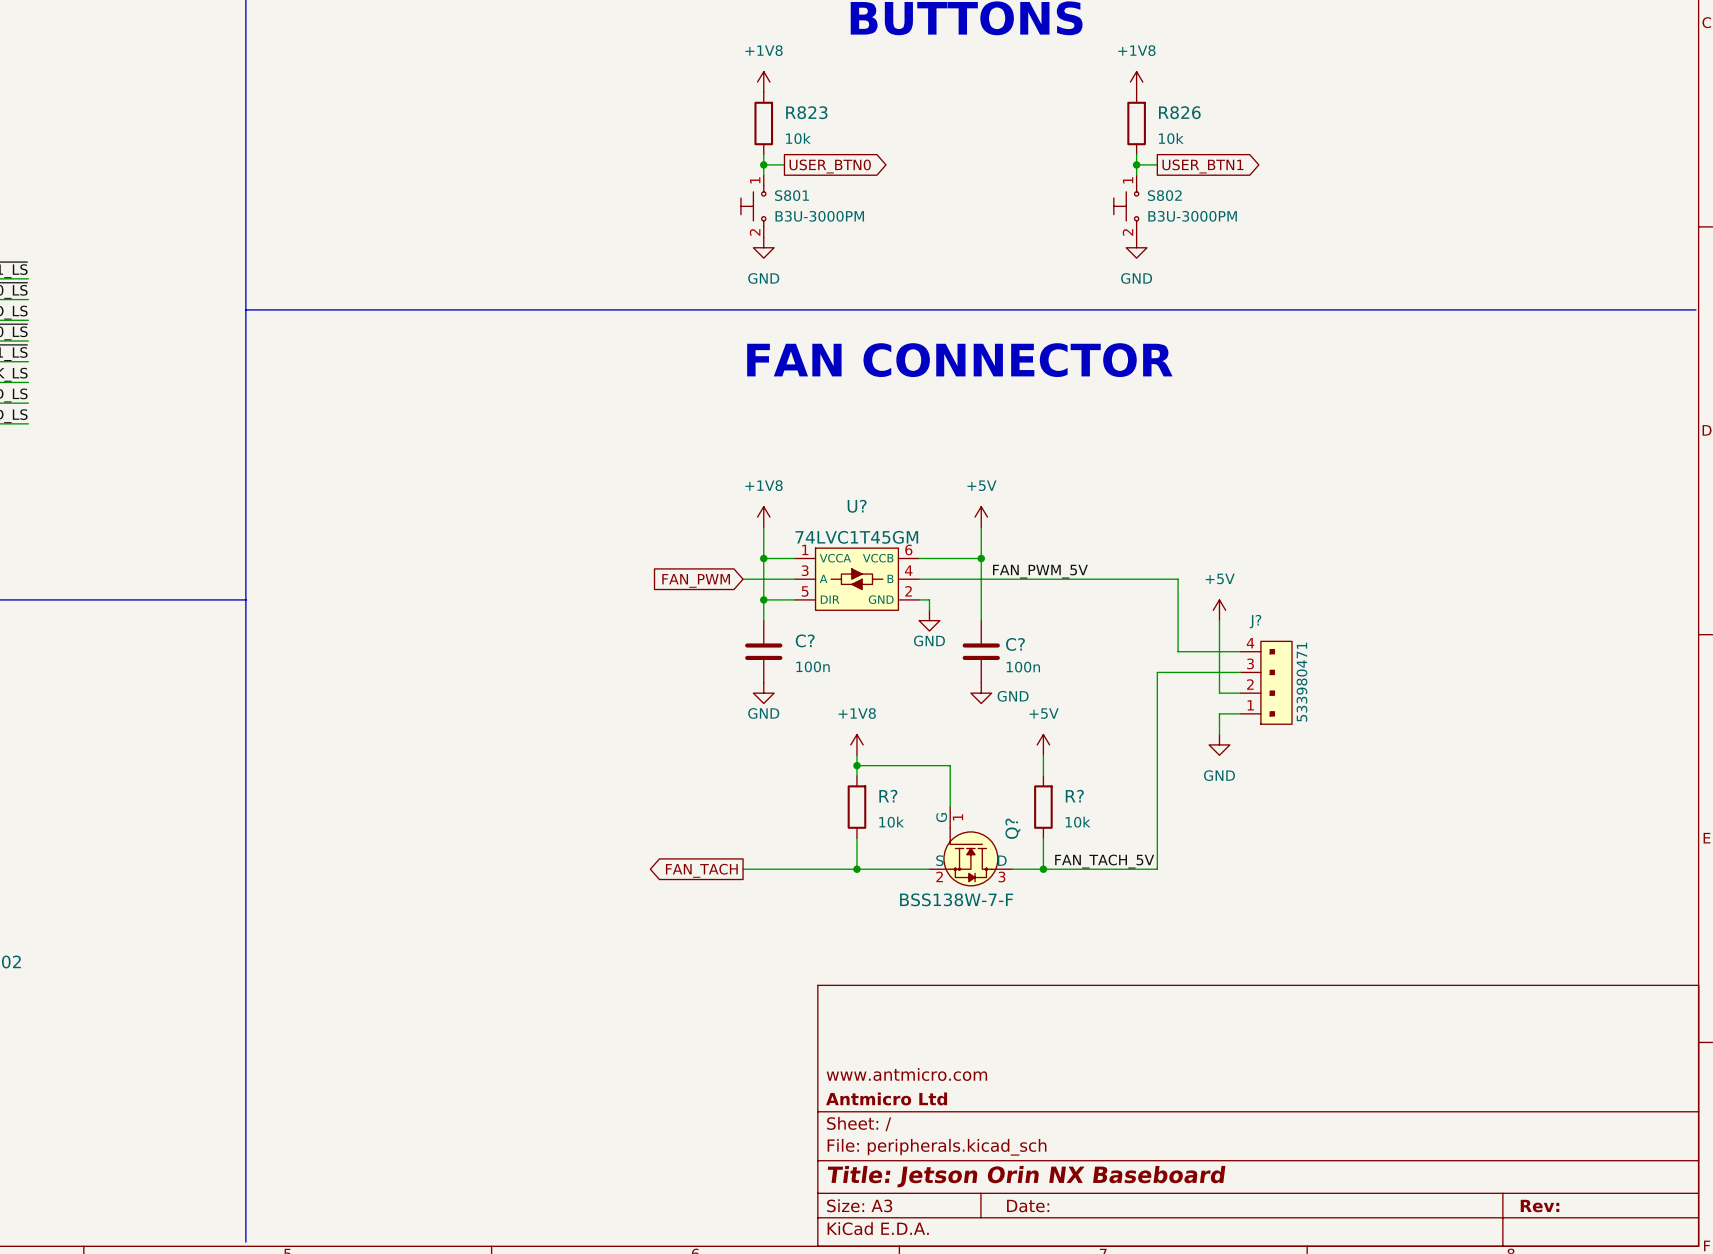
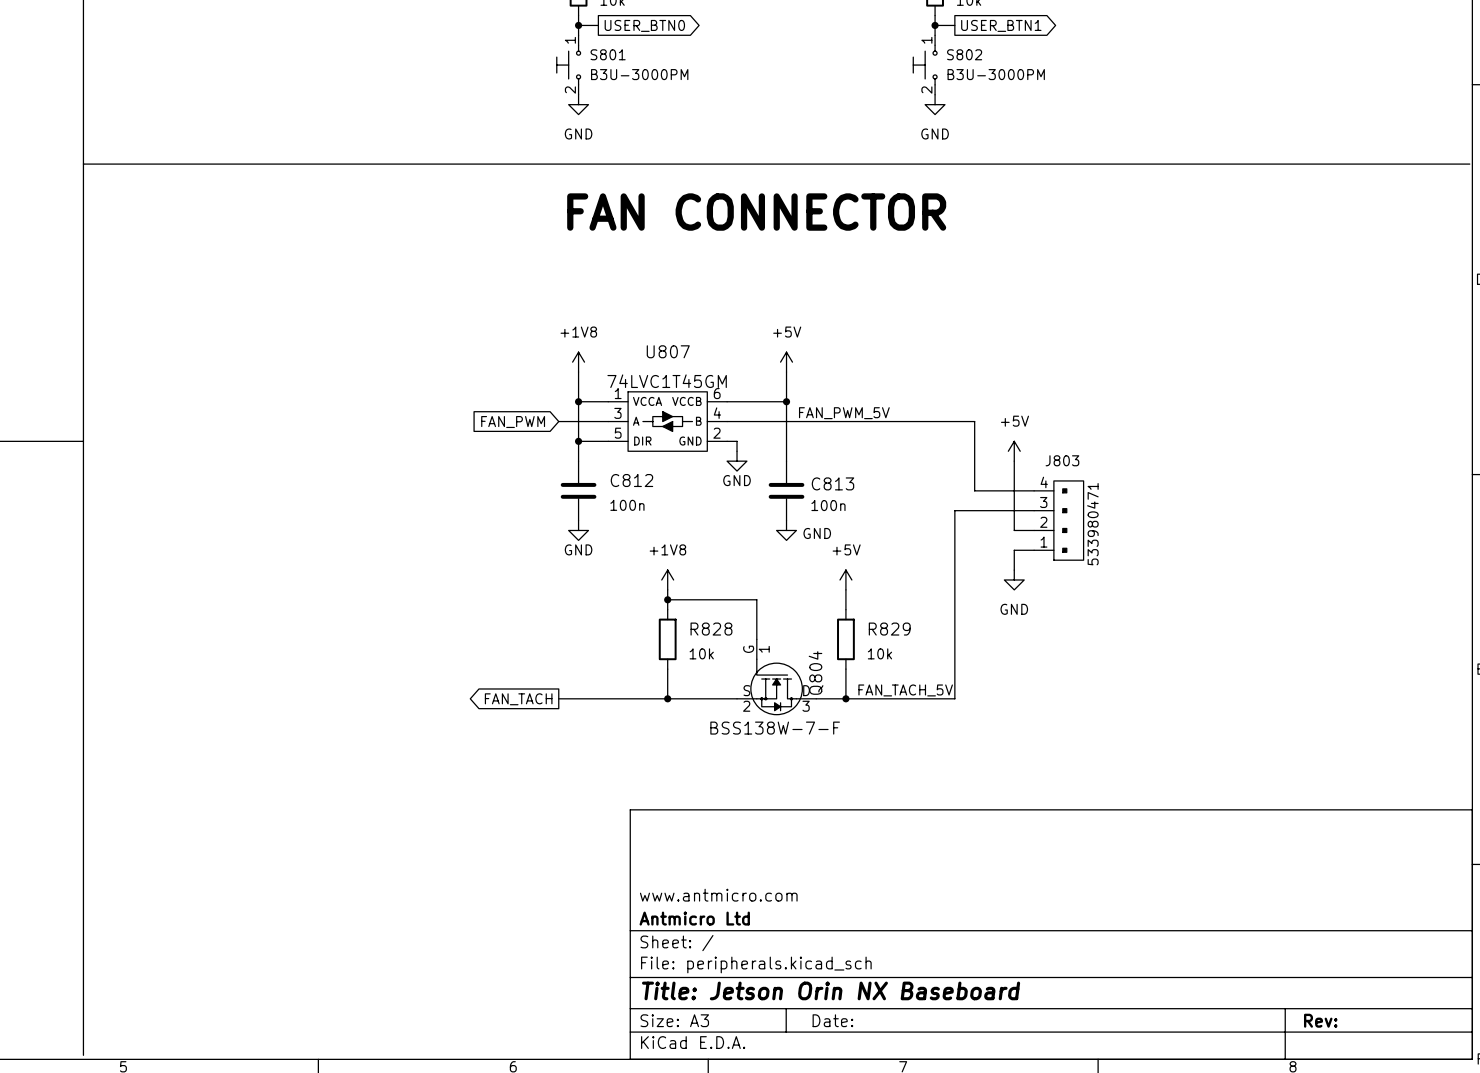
U? name: U? (857, 506) -> U807 (668, 351)
J? name: J? (1255, 621) -> J803 (1062, 460)
C? name: C? (805, 640) -> C812 (631, 480)
C? name: C? (1015, 644) -> C813 (832, 483)
R? name: R? (888, 796) -> R828 (711, 629)
R? name: R? (1074, 796) -> R829 (889, 629)
Q? name: Q? (1012, 828) -> Q804 (816, 673)

